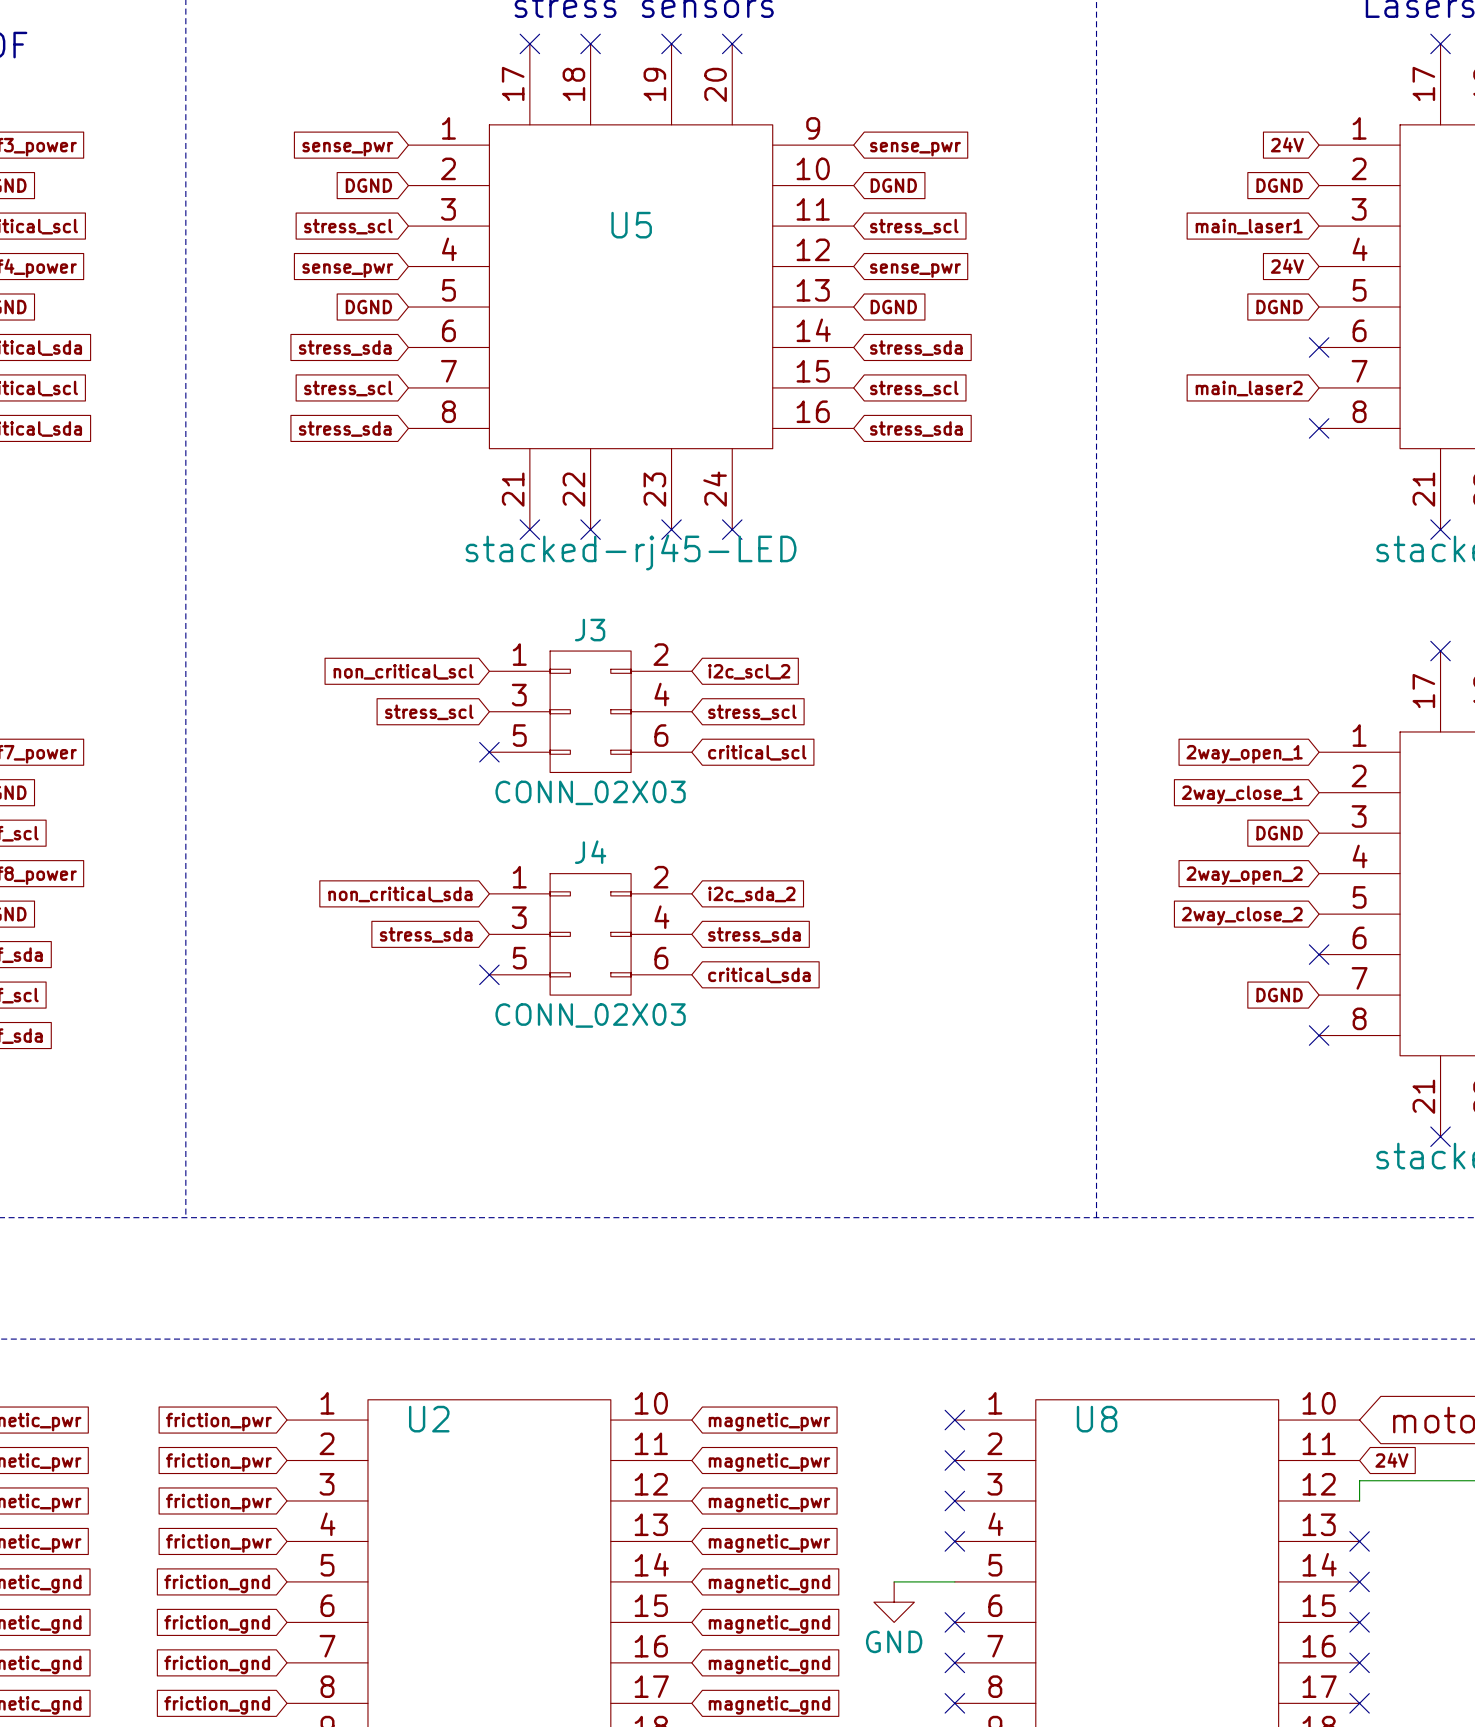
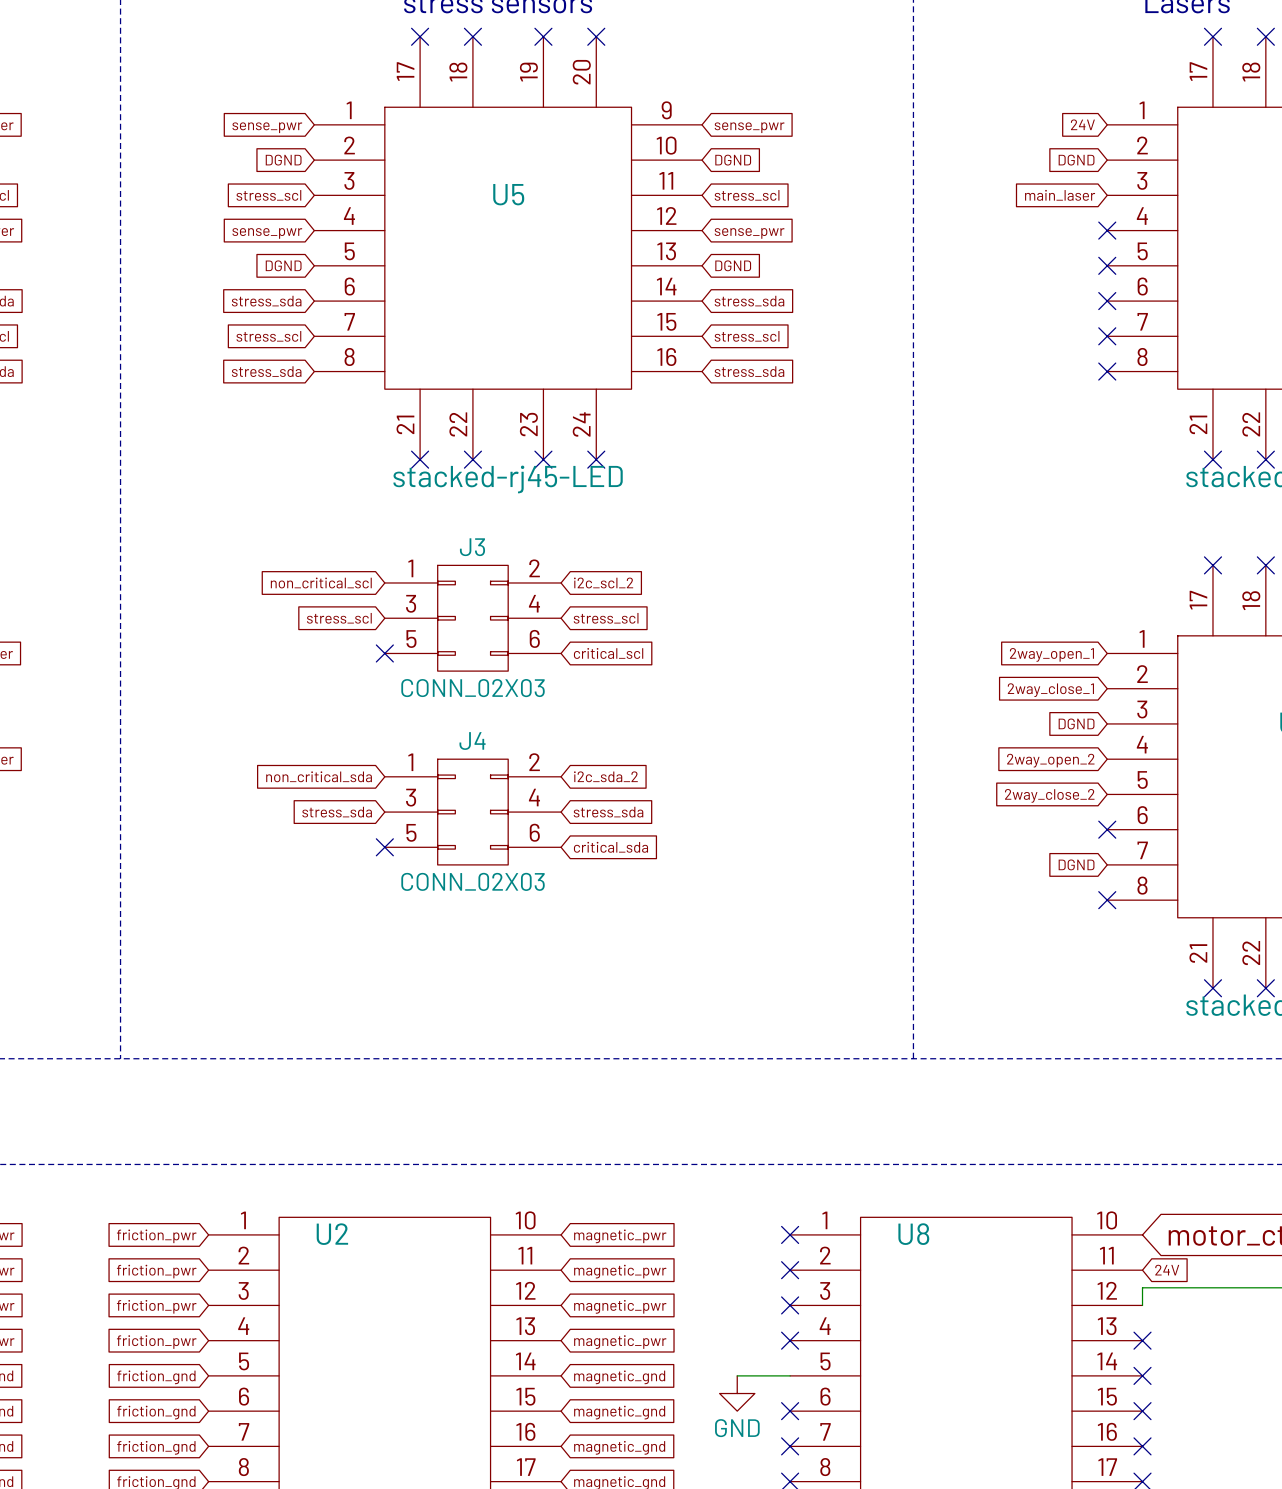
global label: main_laser1 (1249, 226) -> main_laser (1060, 195)
global label: 24V (1287, 266) -> none
no-connect mark: none -> (1107, 230)
global label: DGND (1279, 307) -> none
no-connect mark: none -> (1107, 265)
no-connect mark: none -> (1107, 336)
global label: main_laser2 (1249, 388) -> none

